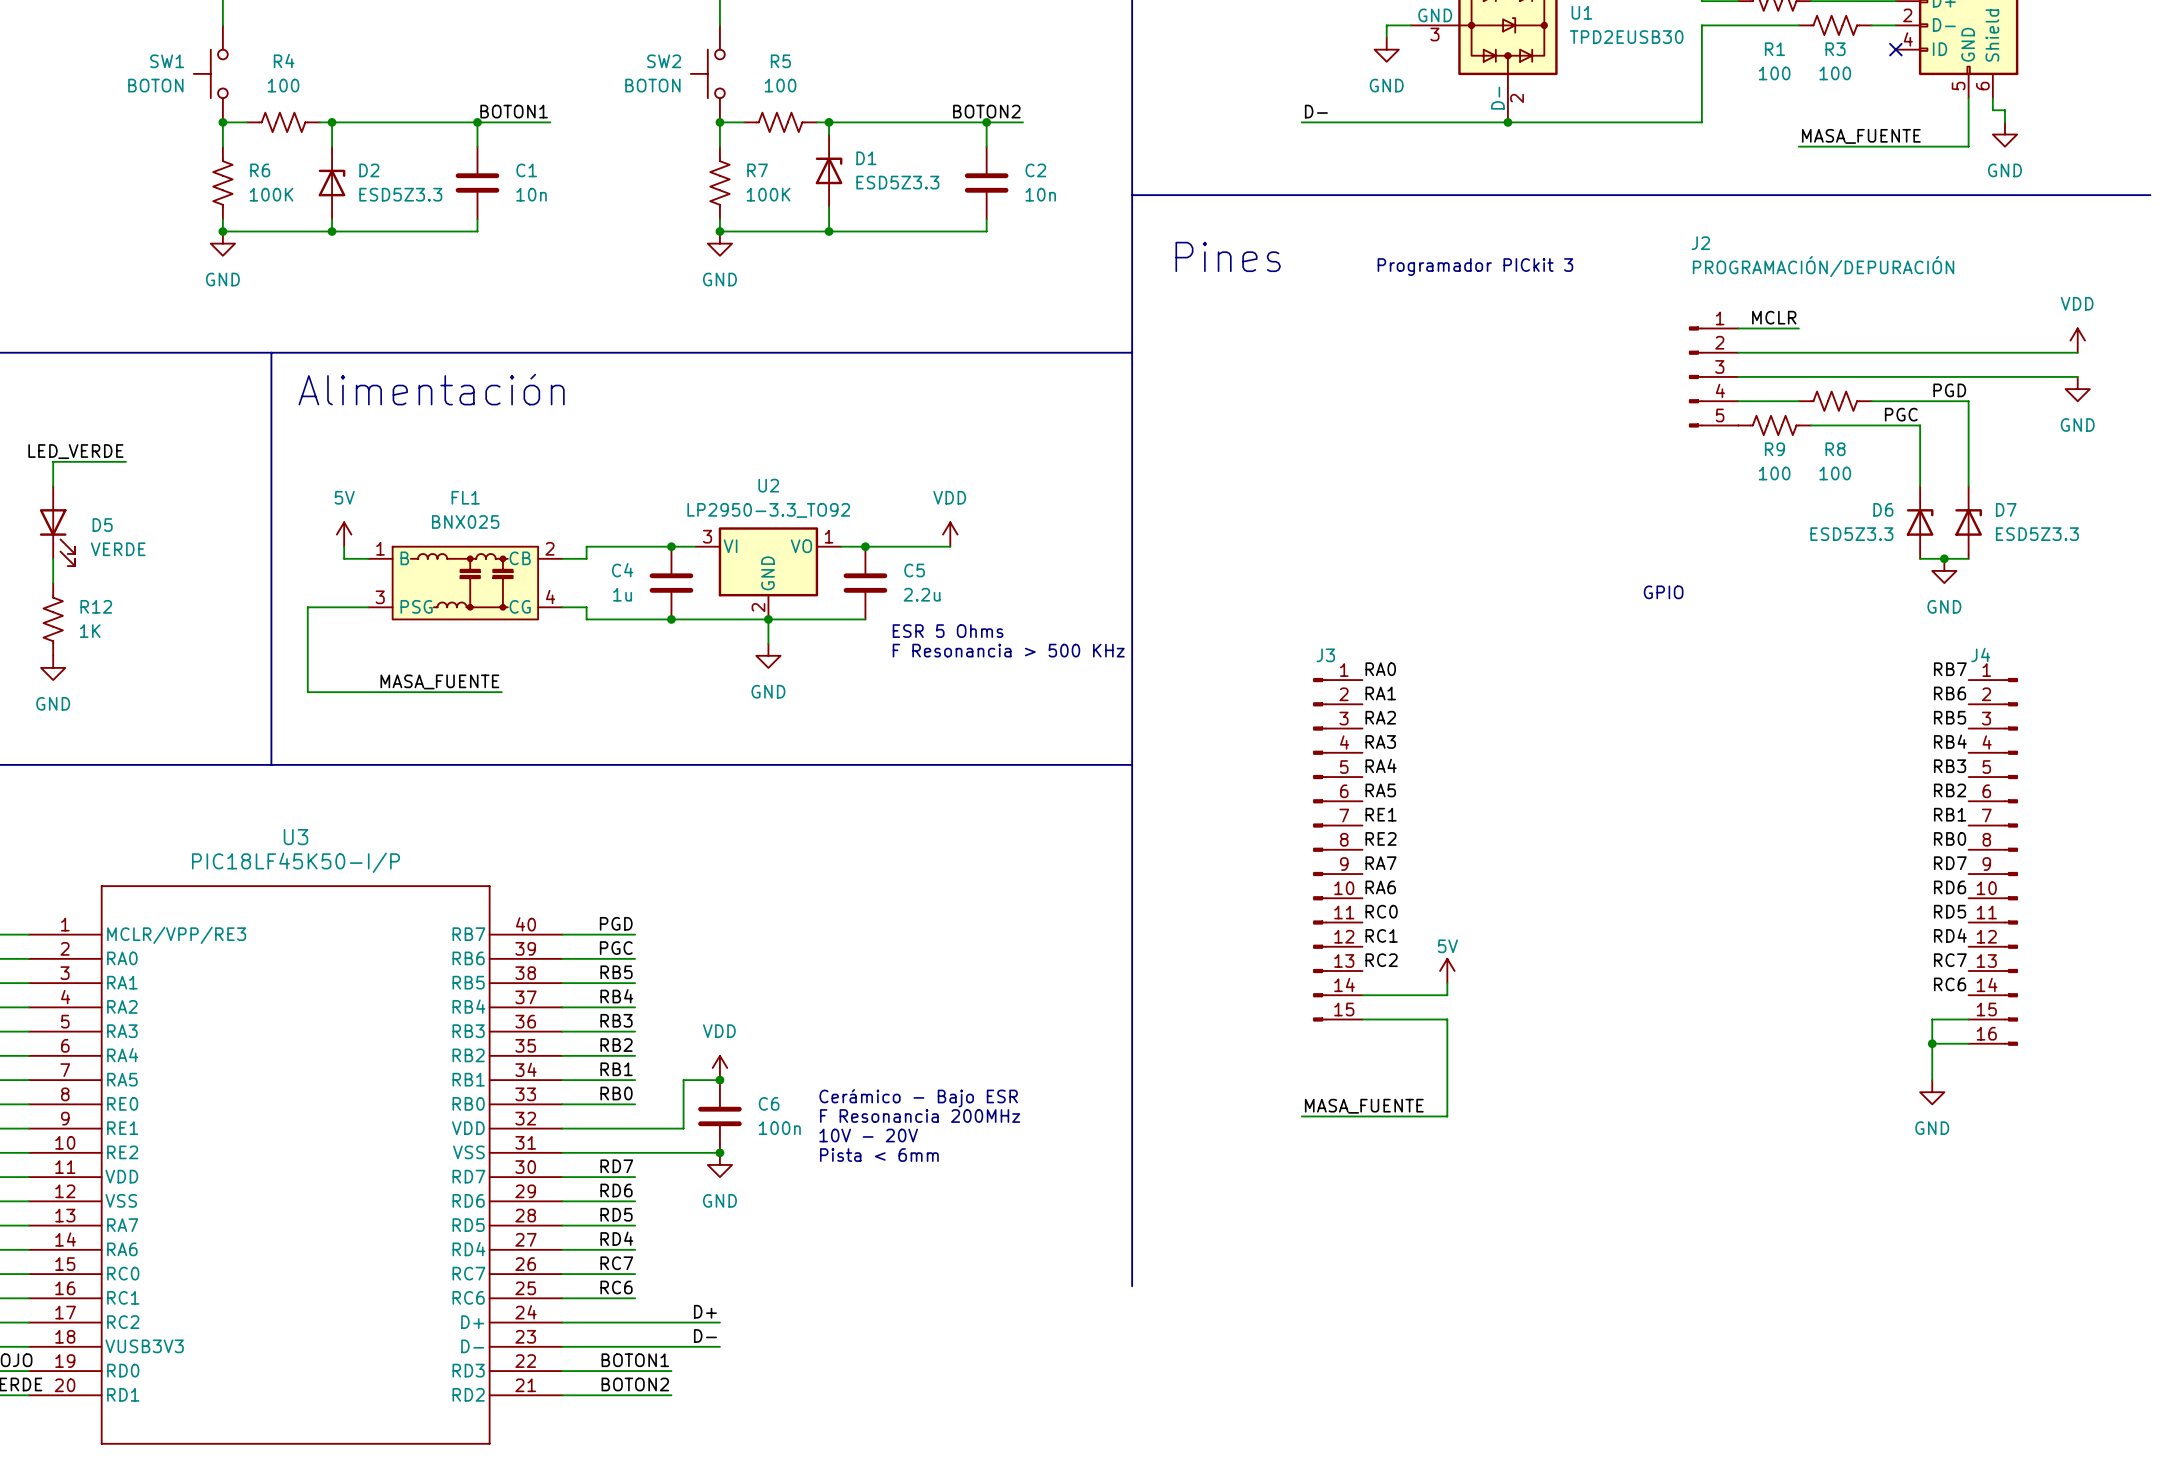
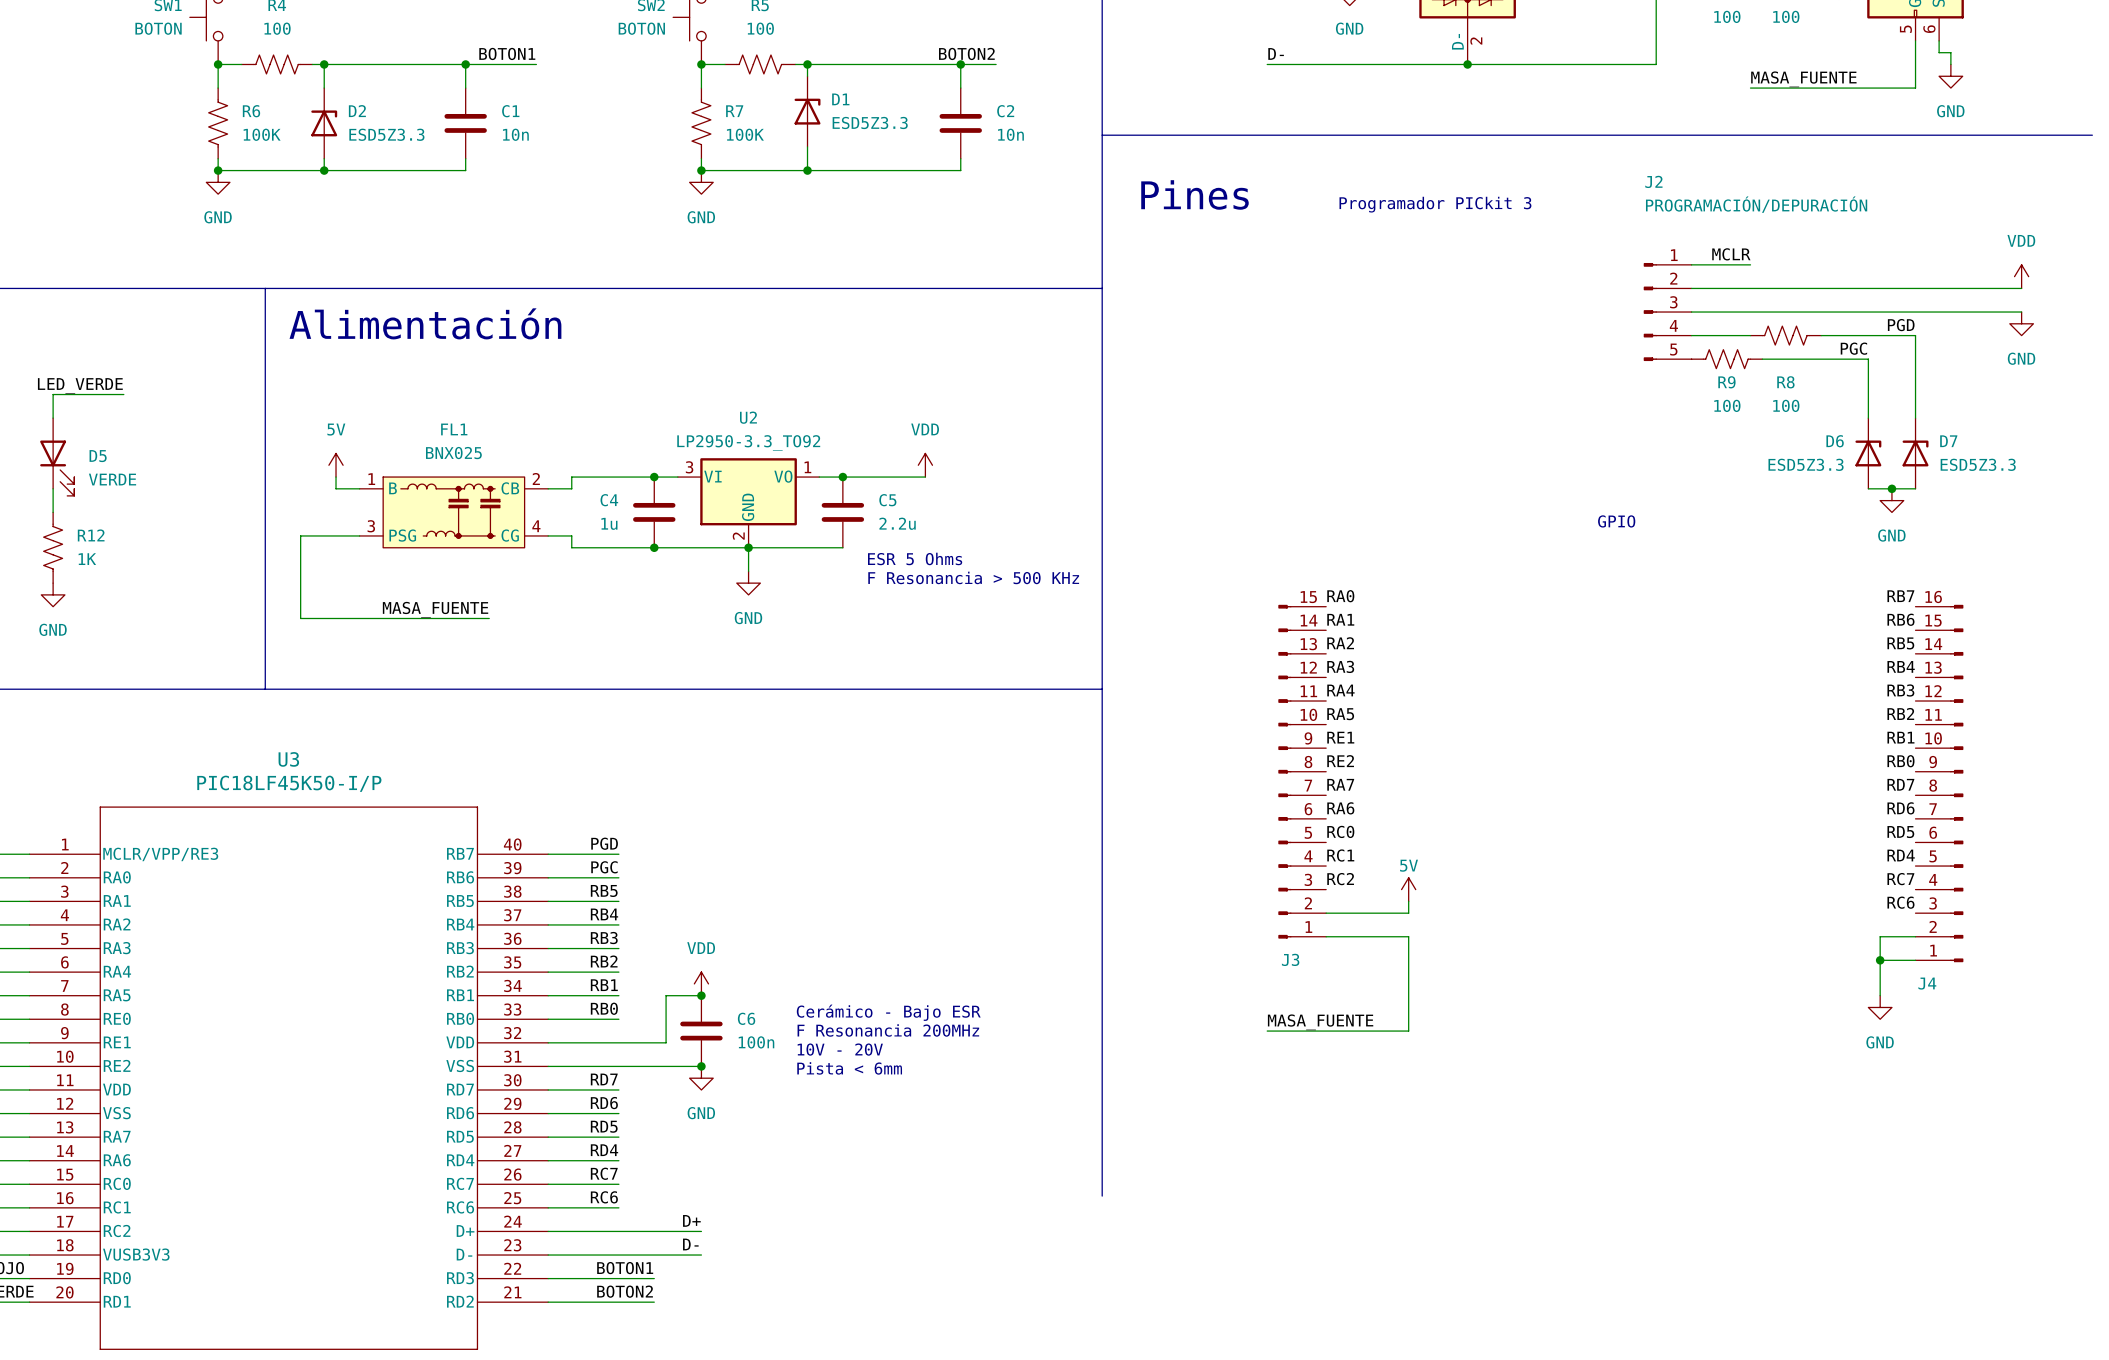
J3 flip: as is (1320, 849) -> up-down (1284, 771)
J4 flip: as is (2011, 861) -> up-down (1956, 783)

